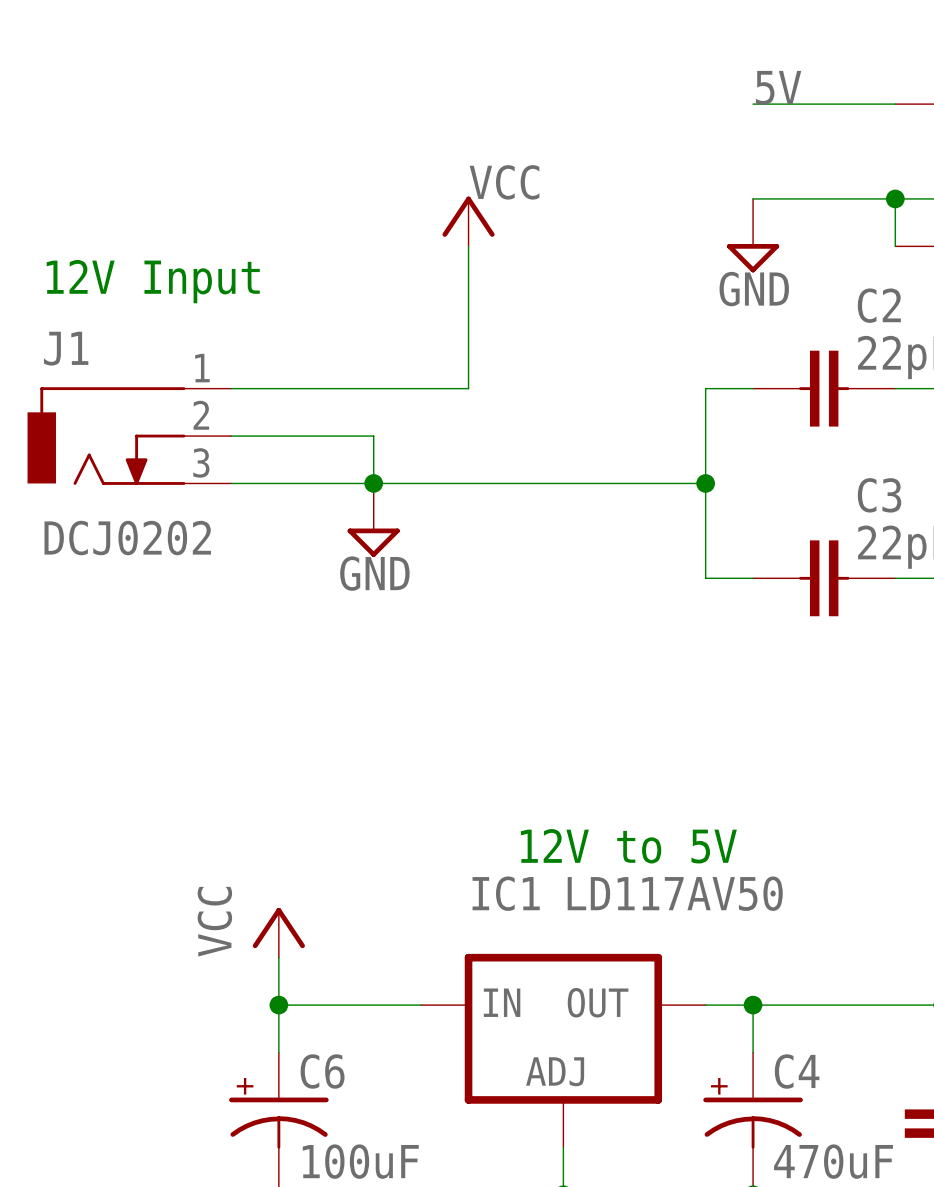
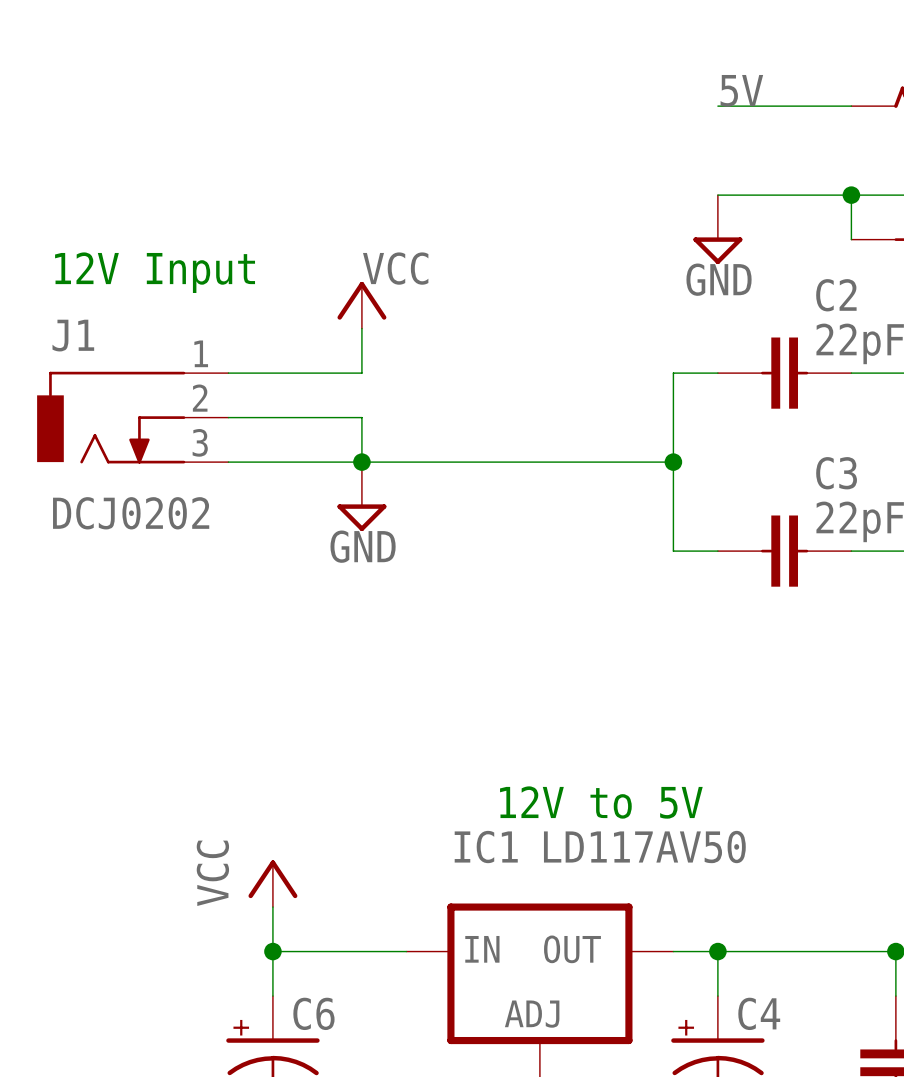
power symbol position: VCC (468, 221) -> VCC (361, 305)
wire: (468, 246) (468, 388) (373, 388) -> (361, 328) (361, 373)

